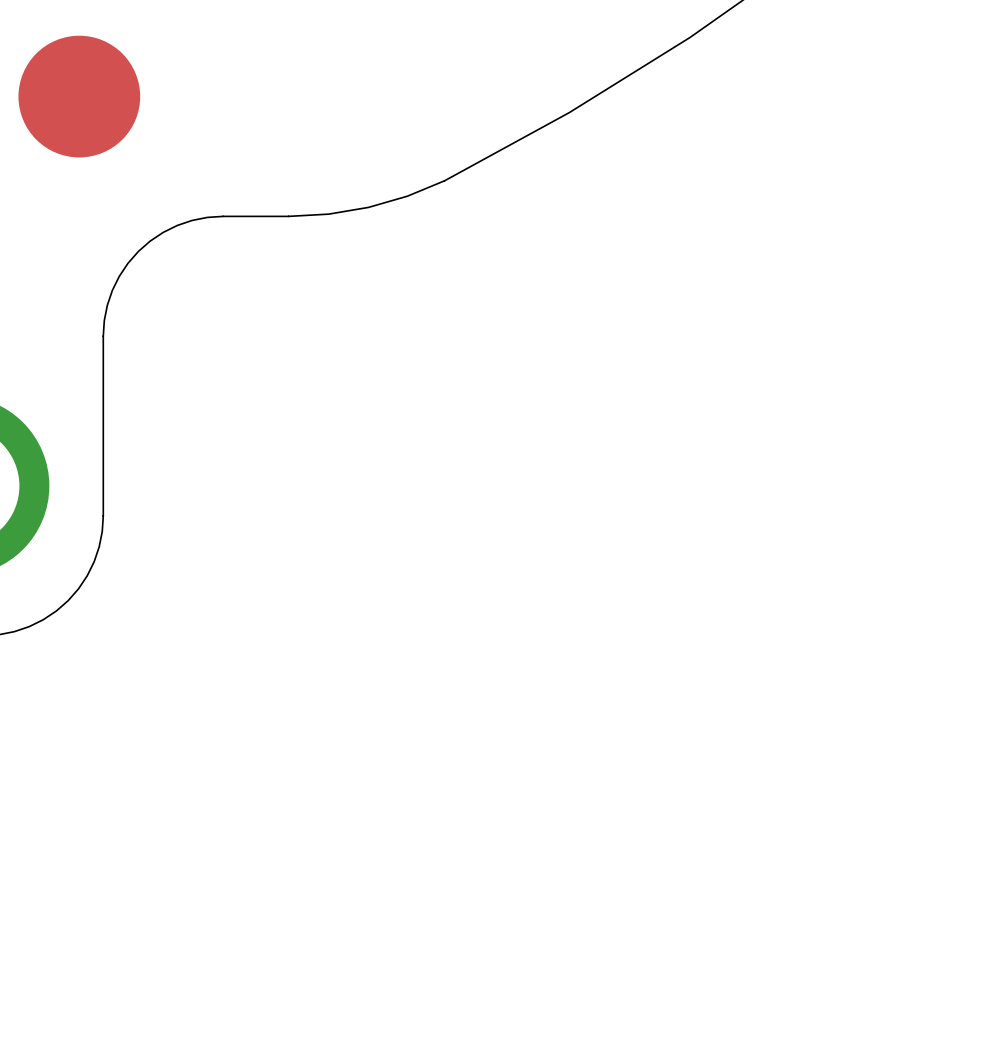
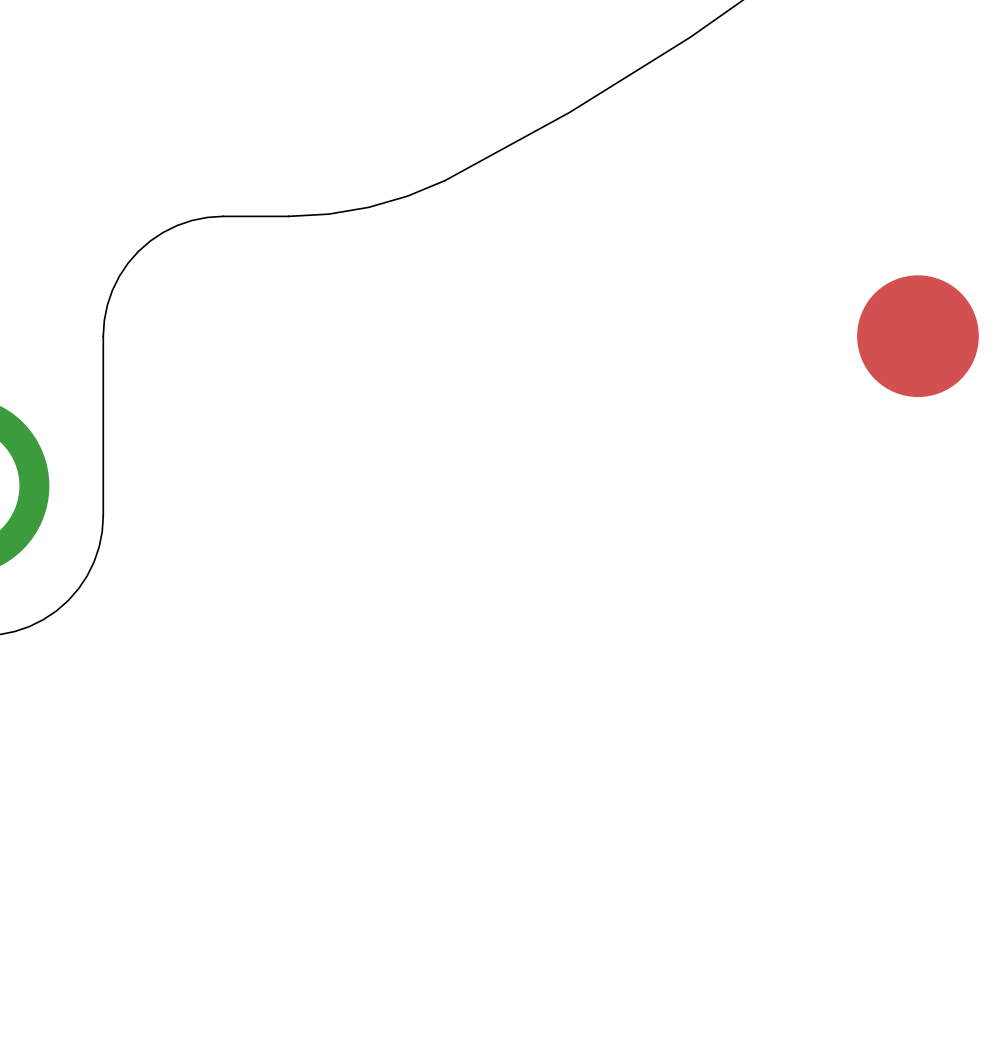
part position: (79, 96) -> (917, 336)

